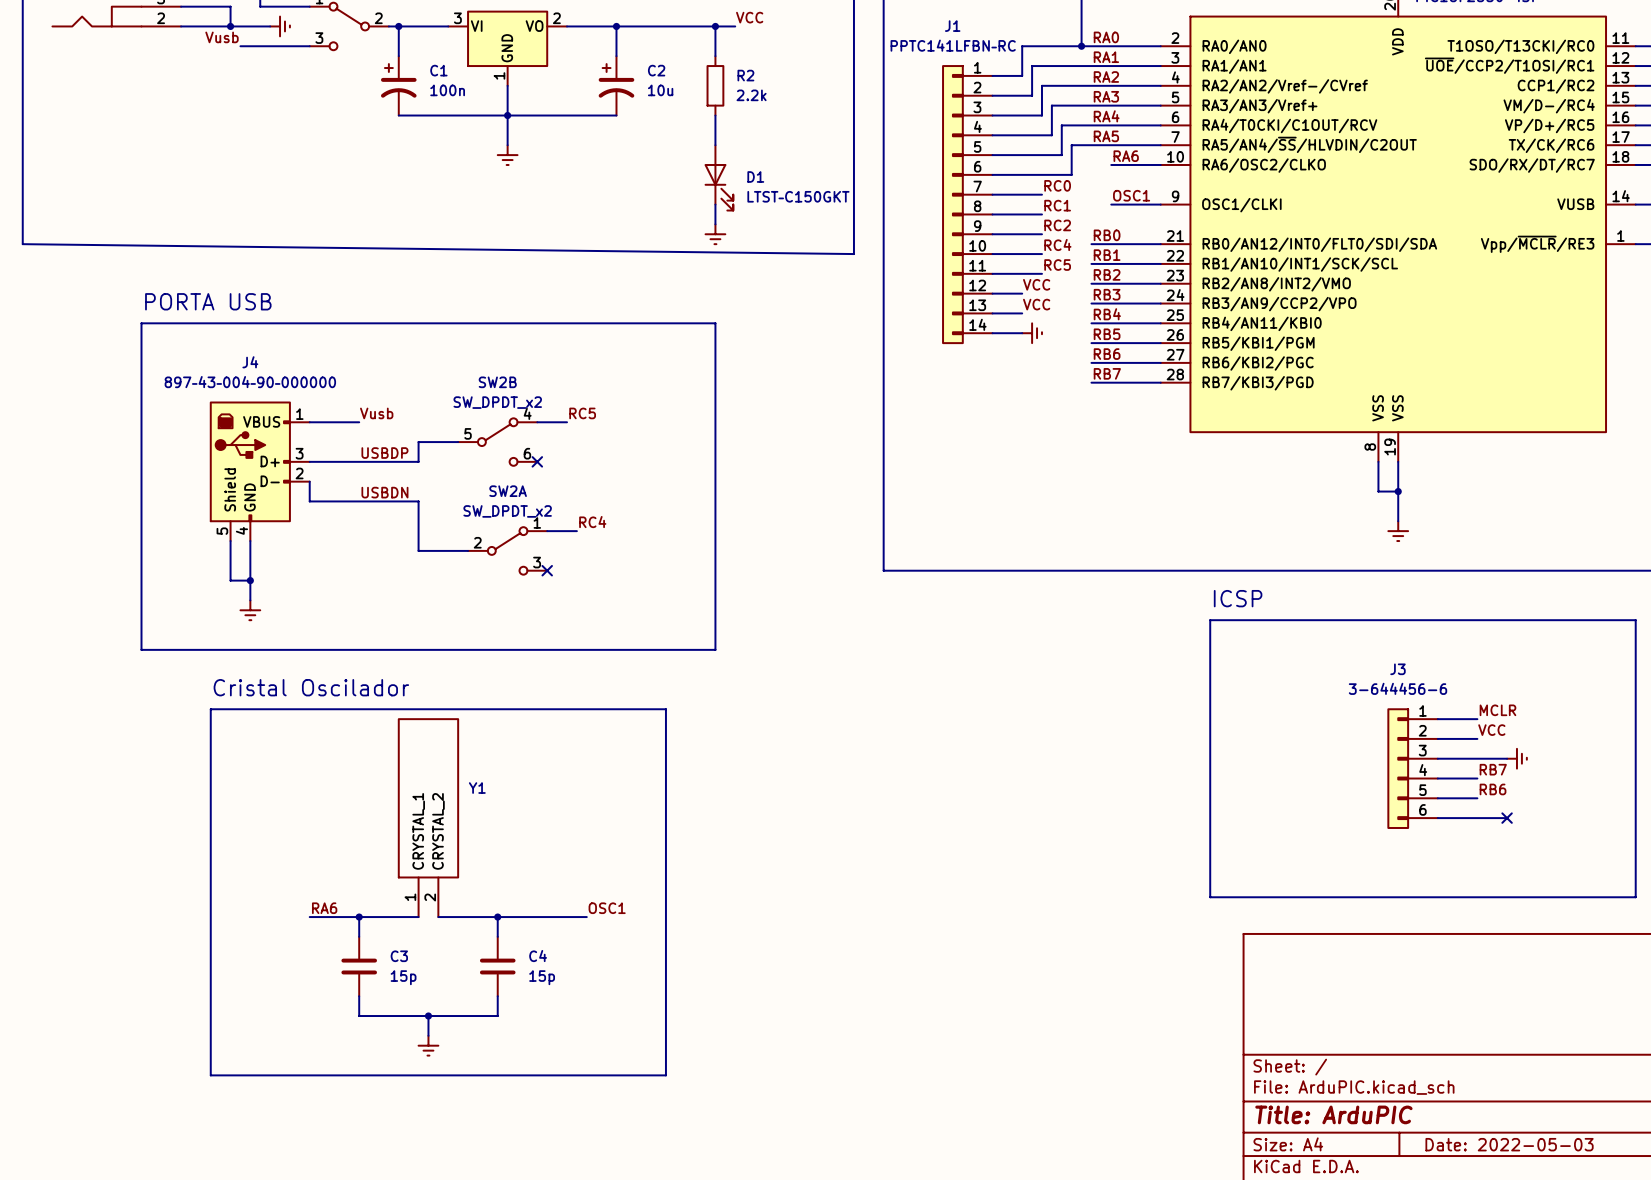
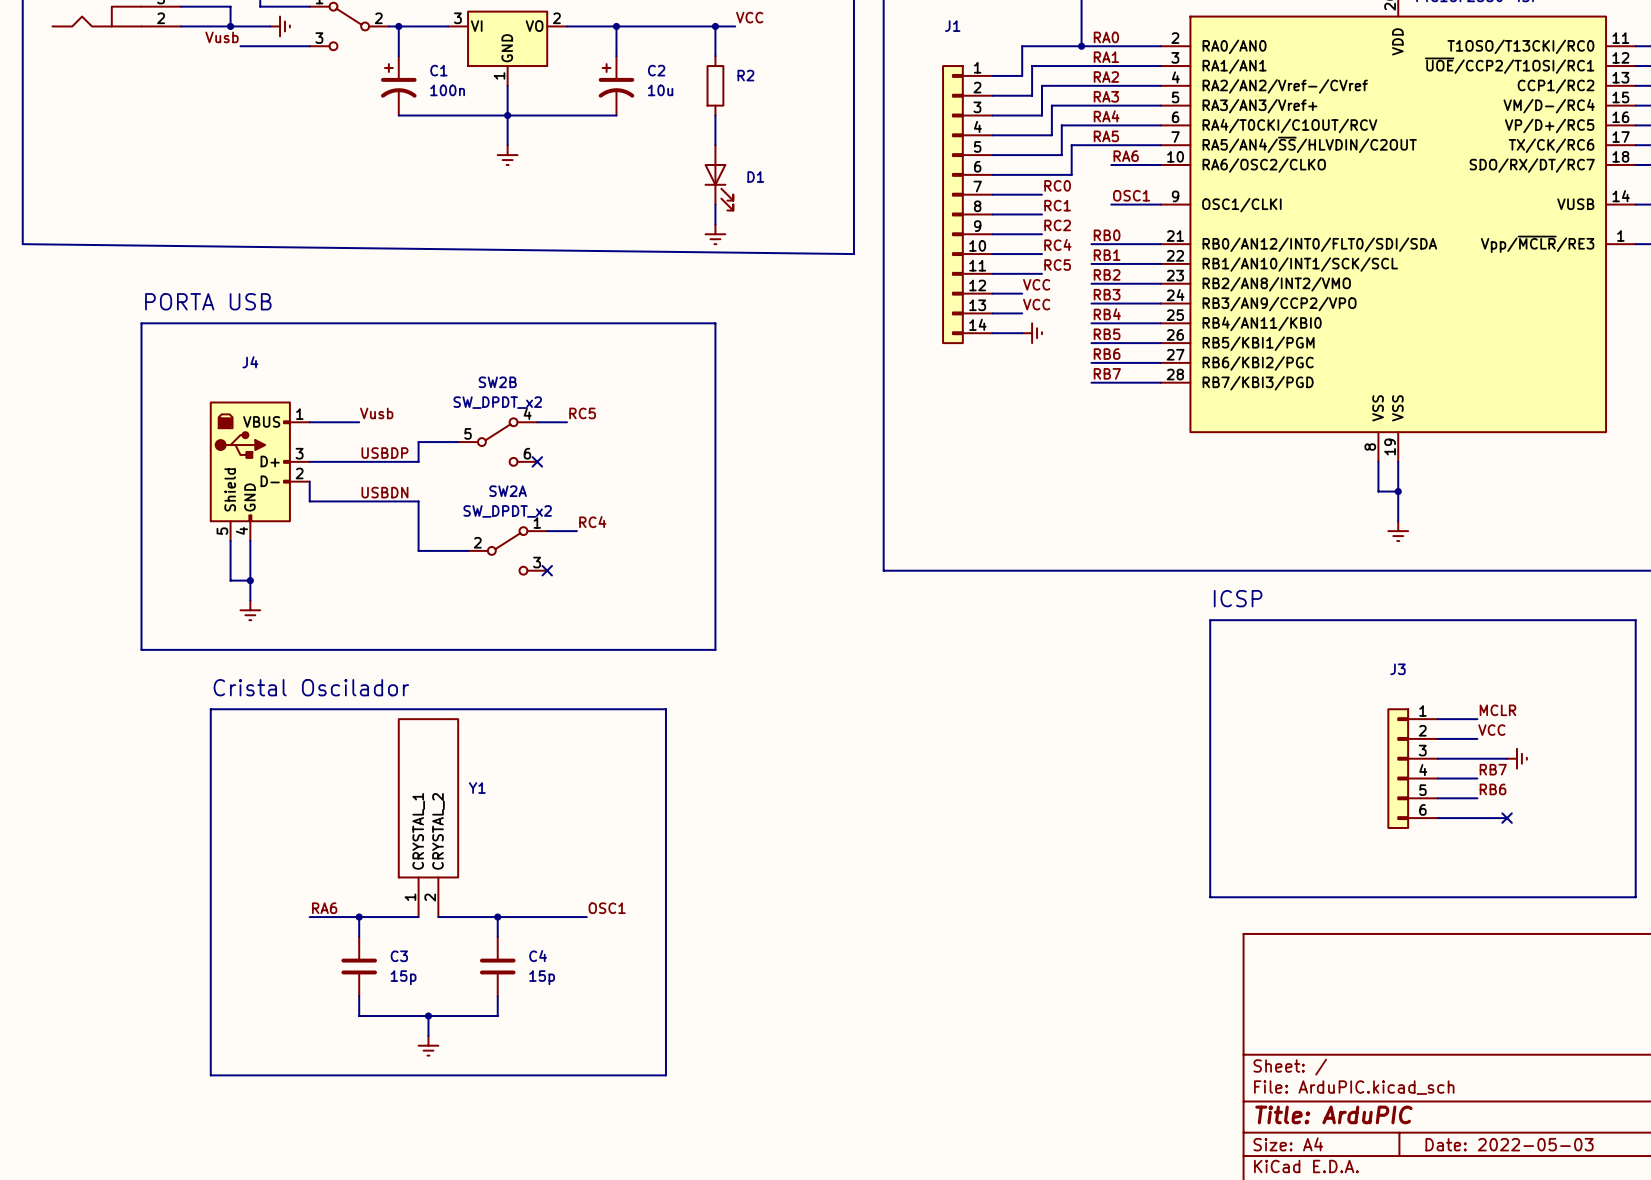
J1 value: PPTC141LFBN–RC (953, 45) -> none
R2 value: 2.2k (751, 95) -> none
D1 value: LTST–C150GKT (798, 196) -> none
J4 value: 897–43–004–90–000000 (250, 382) -> none
J3 value: 3-644456-6 (1397, 688) -> none

